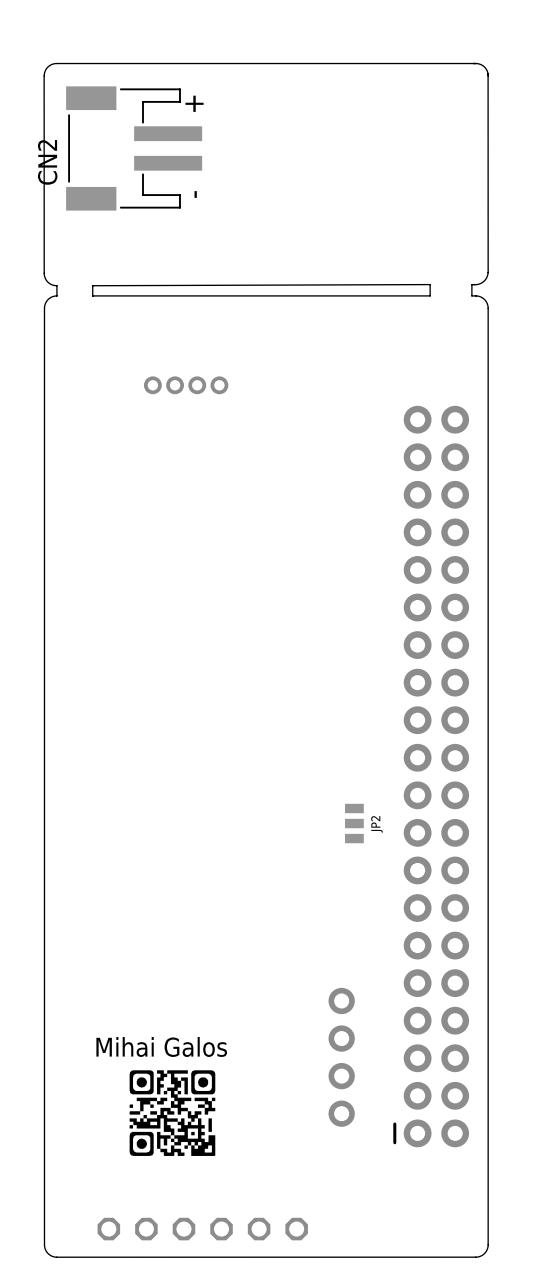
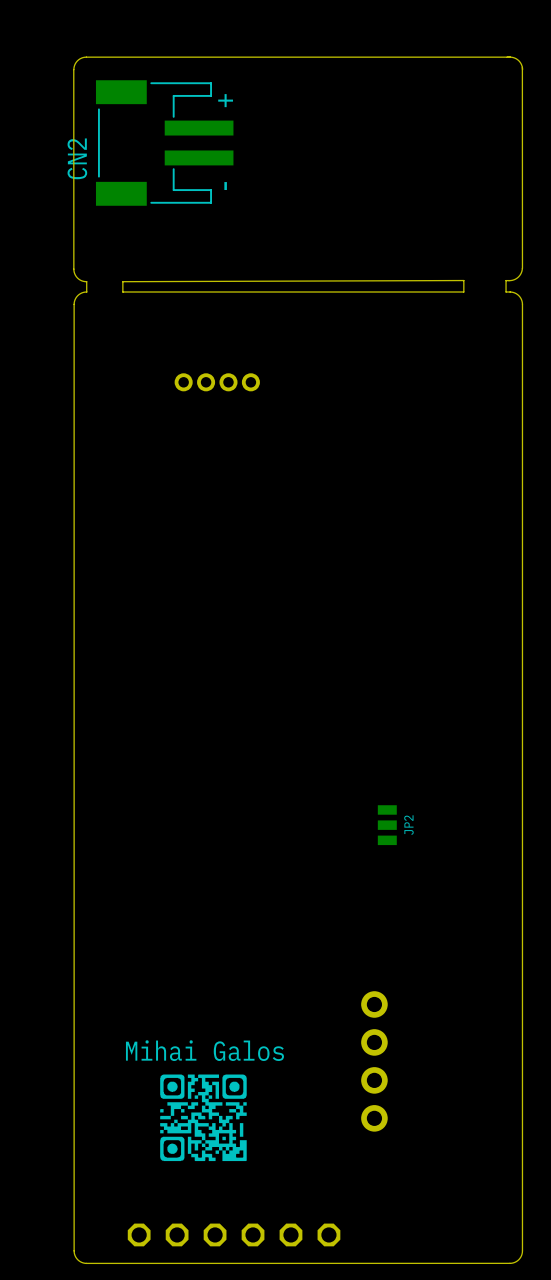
part: (431, 776) -> none

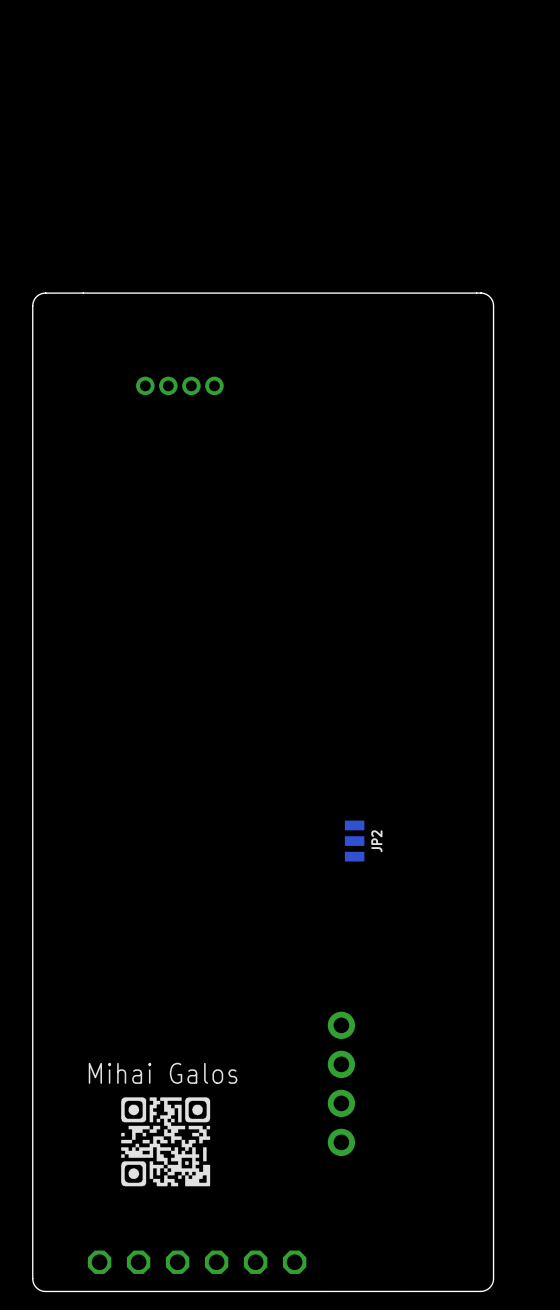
board edge: (86, 57) (77, 60) (73, 69) -> none
board edge: (510, 57) (86, 57) -> none
board edge: (510, 57) (518, 60) (522, 69) -> none
board edge: (522, 67) (522, 268) -> none
board edge: (73, 69) (73, 269) (77, 277) (86, 281) (86, 291) -> (83, 293) (45, 293)
CN2: (164, 143) -> none
board edge: (522, 268) (516, 278) (506, 280) (506, 291) -> (433, 293) (476, 293)
board edge: (463, 291) (463, 280) (122, 281) (123, 292) -> none

